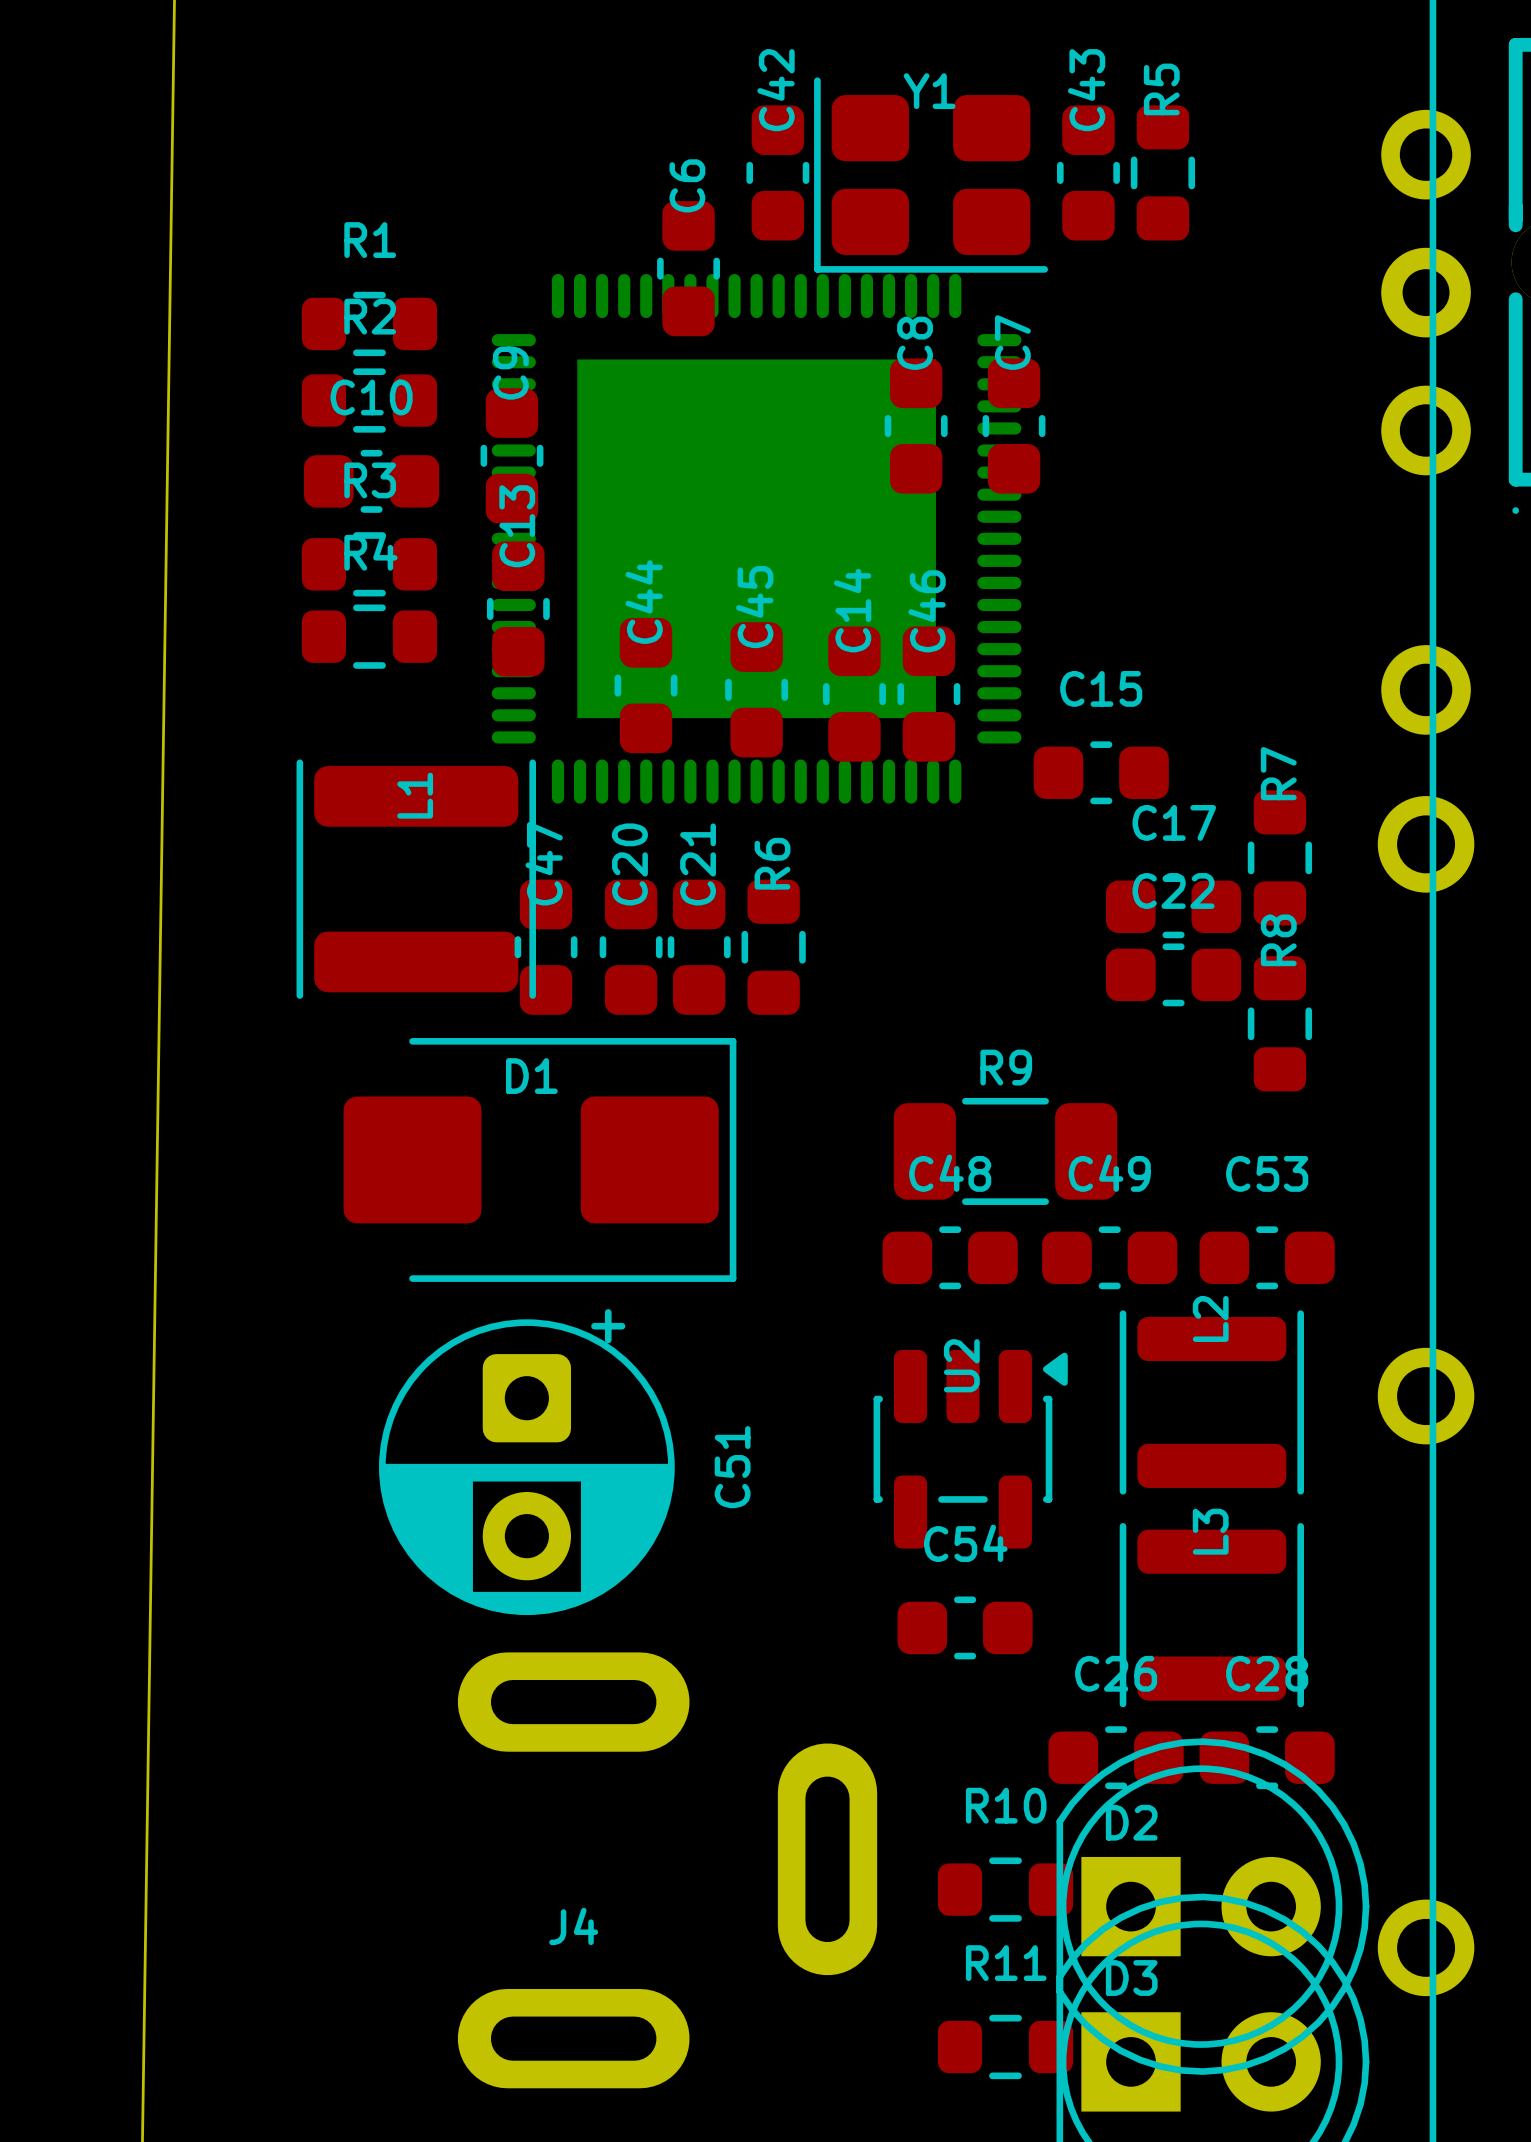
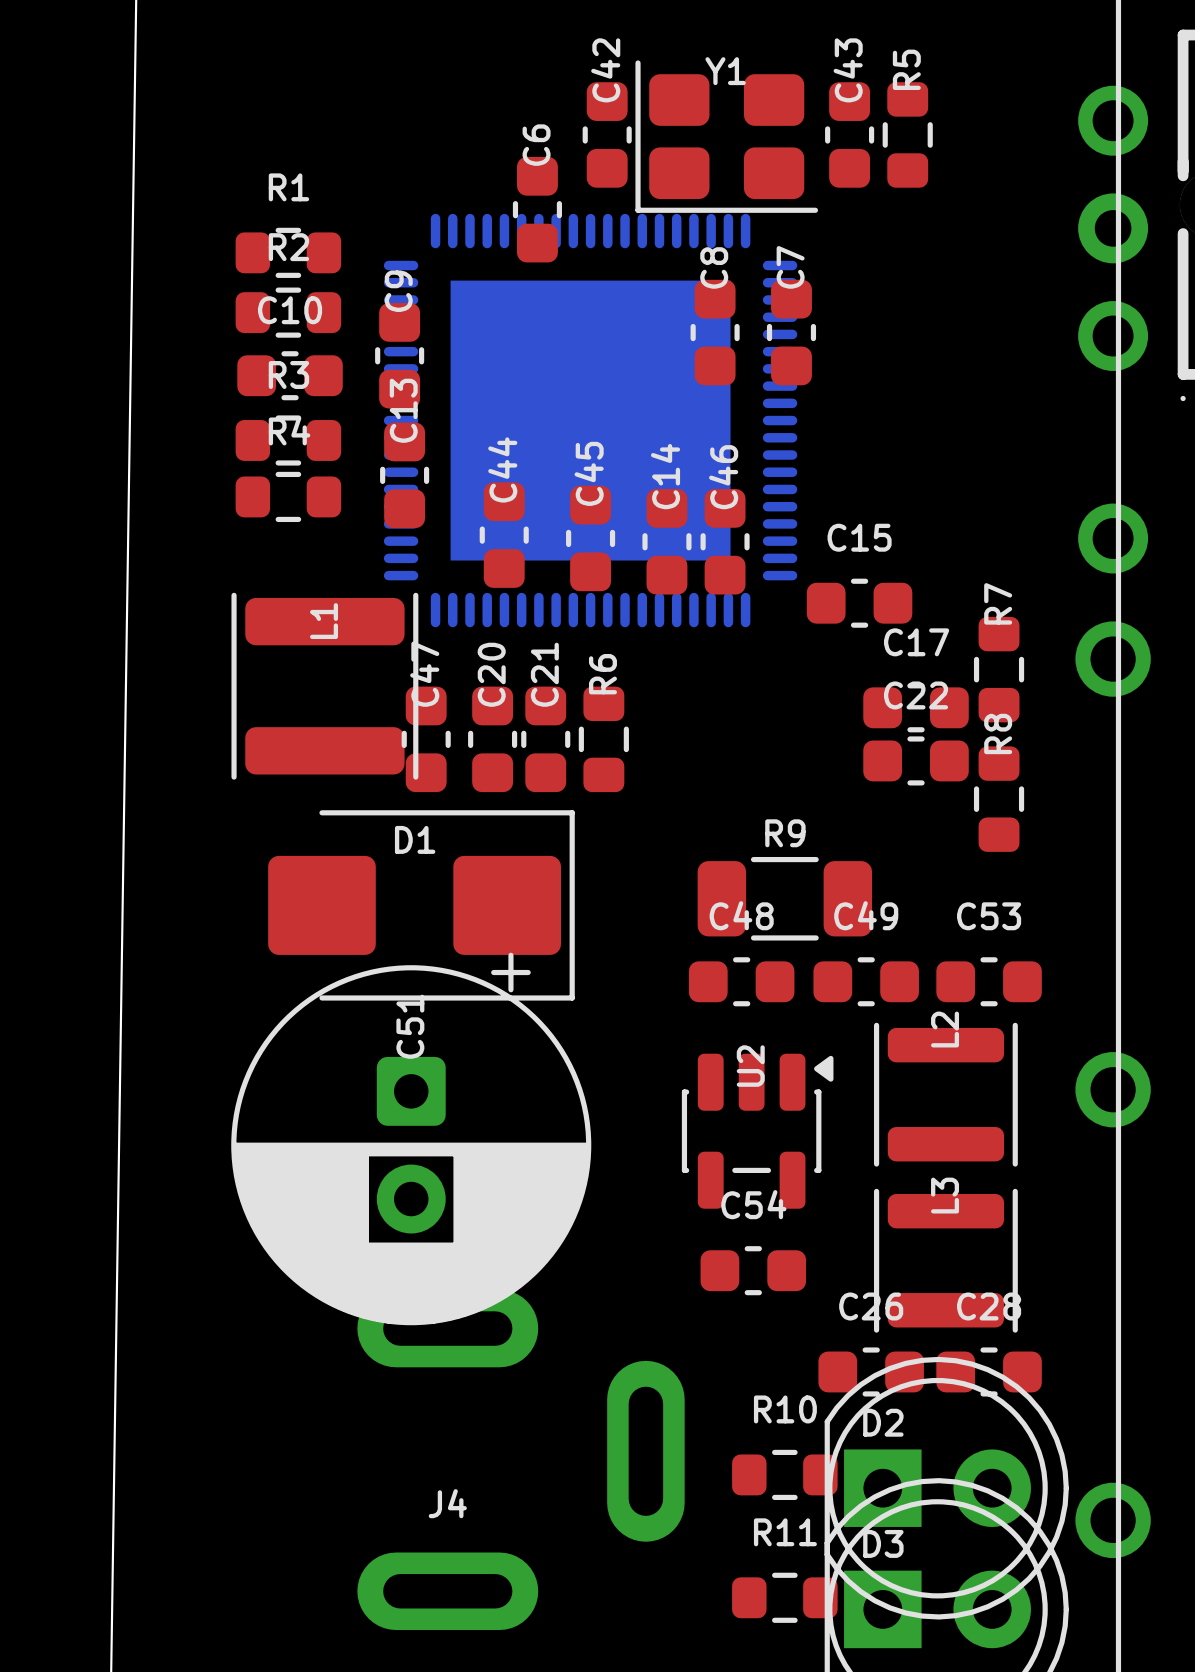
C51 footprint: [379, 1309, 675, 1616] -> [231, 952, 592, 1326]
C51 name position: C51 (732, 1467) -> C51 (410, 1026)

